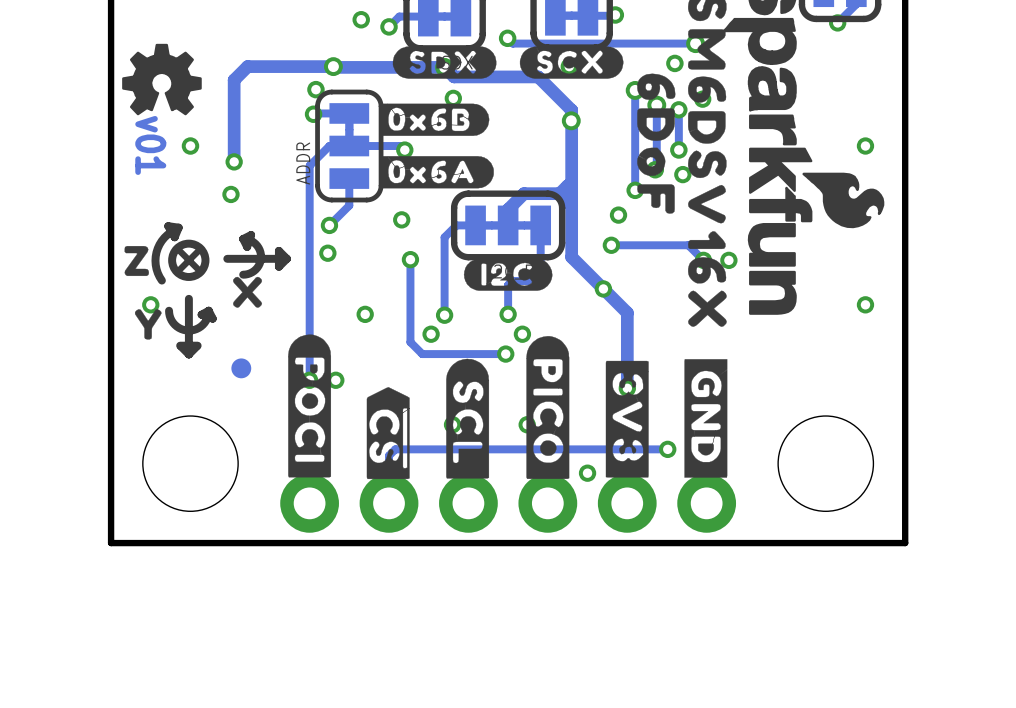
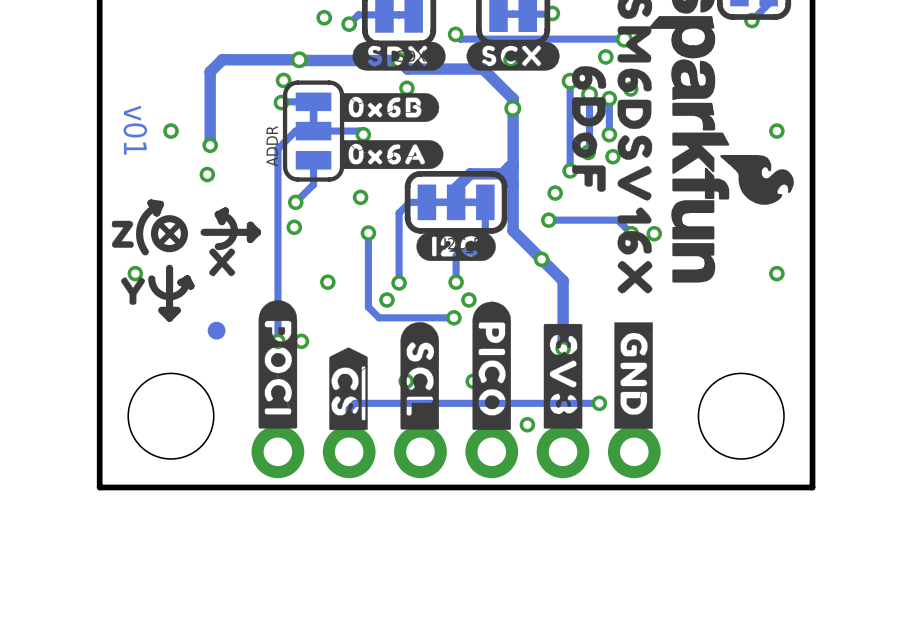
drawing: [122, 43, 202, 116] -> none

